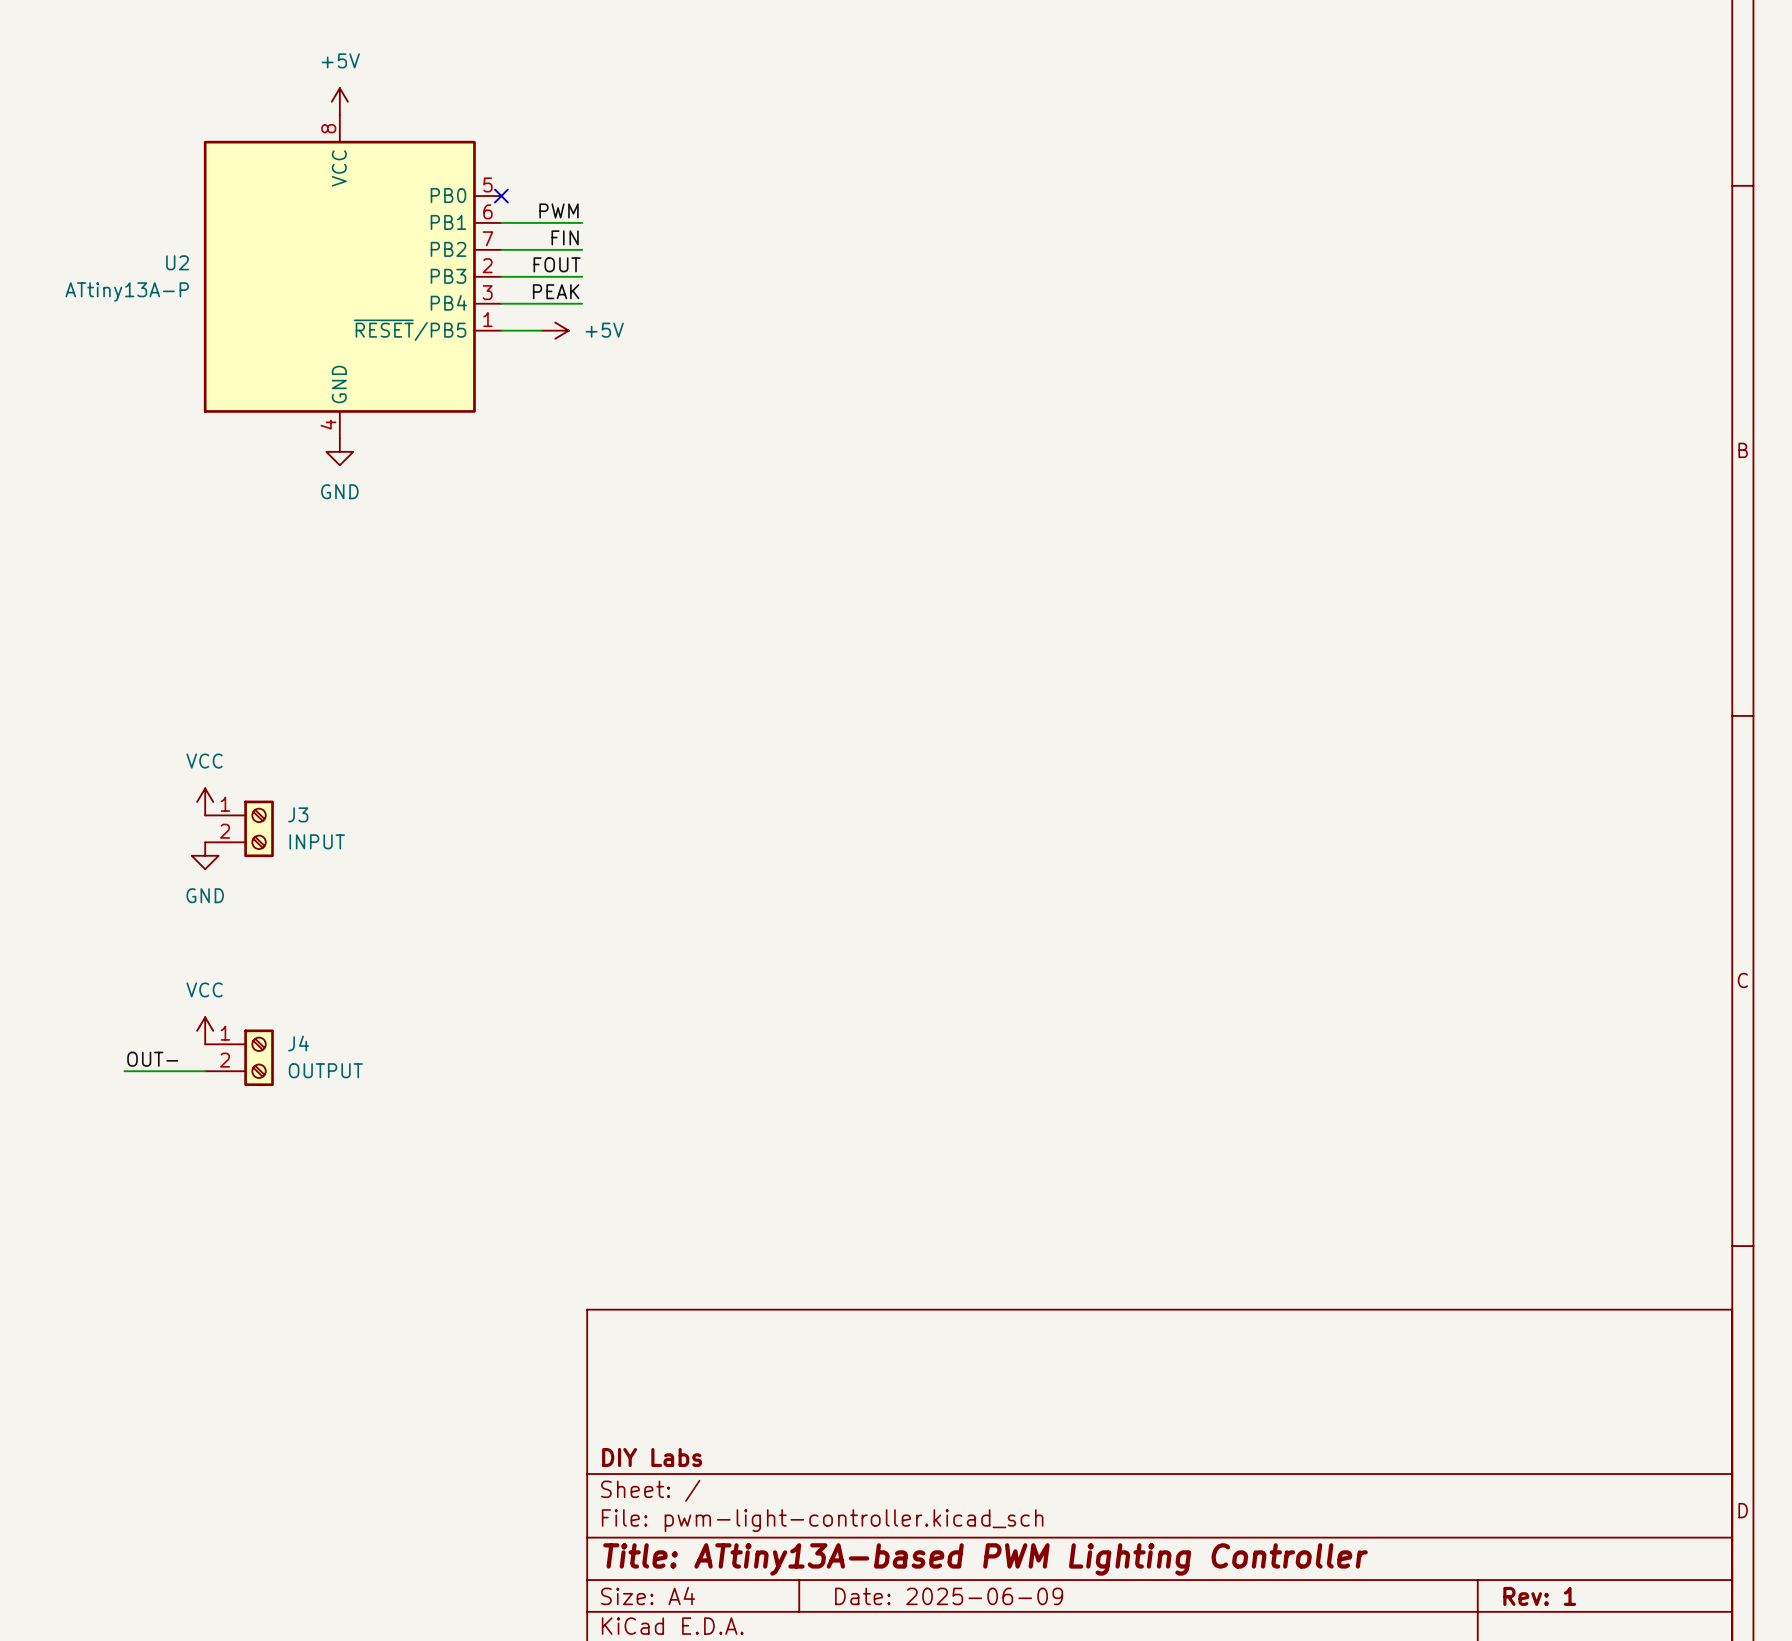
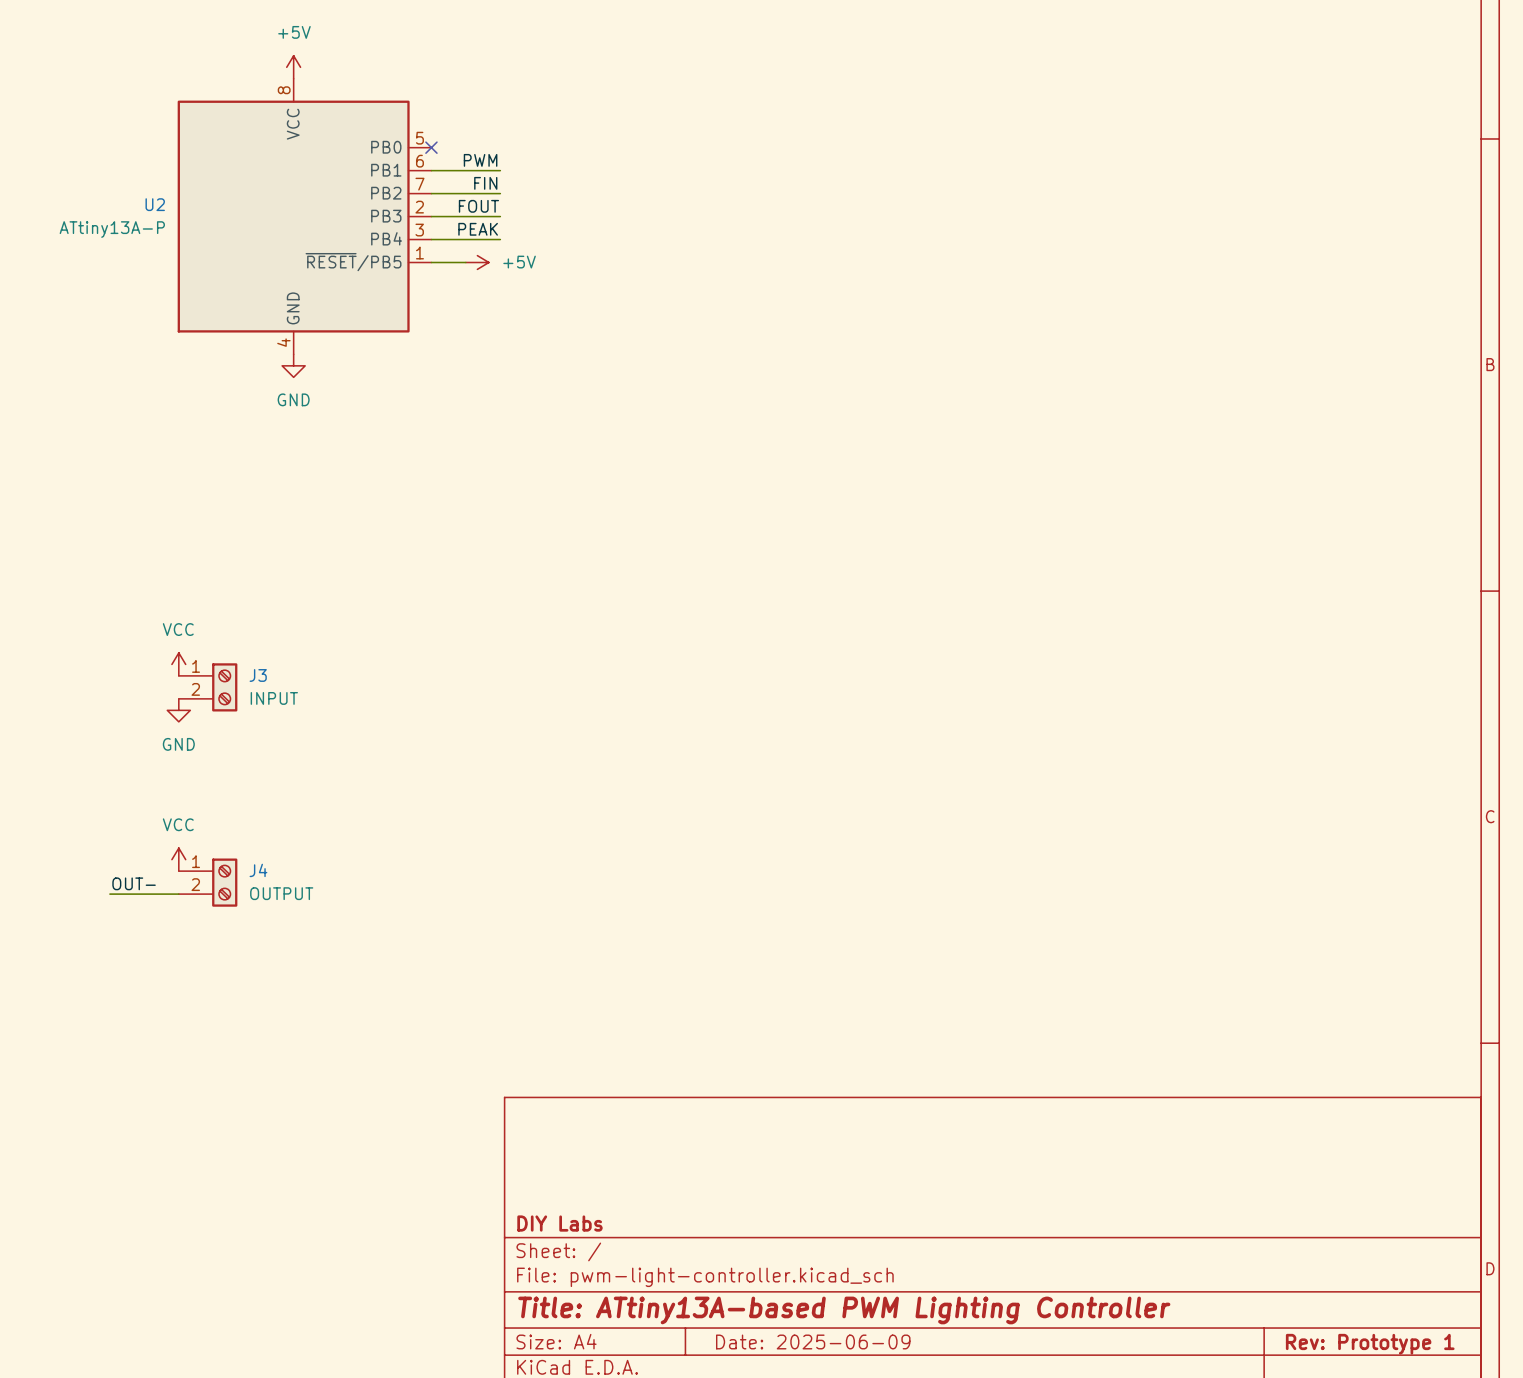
title block: Rev: 1 (1539, 1596) -> Rev: Prototype 1 (1370, 1344)

